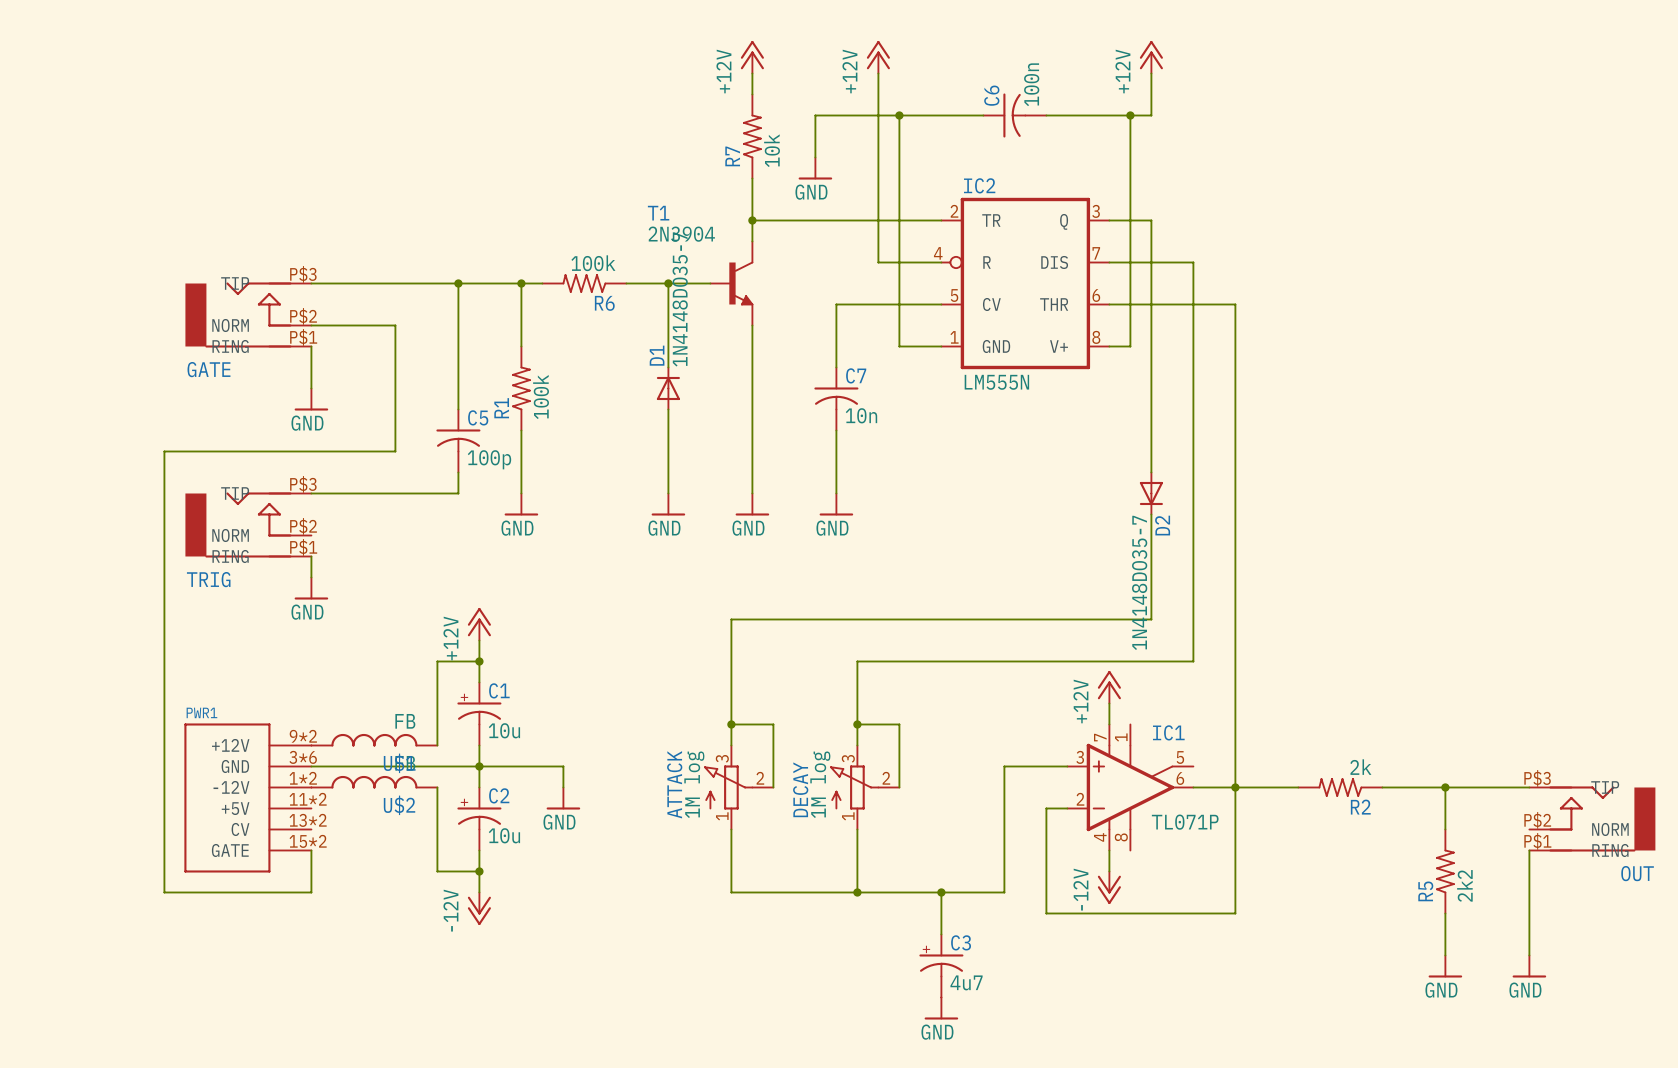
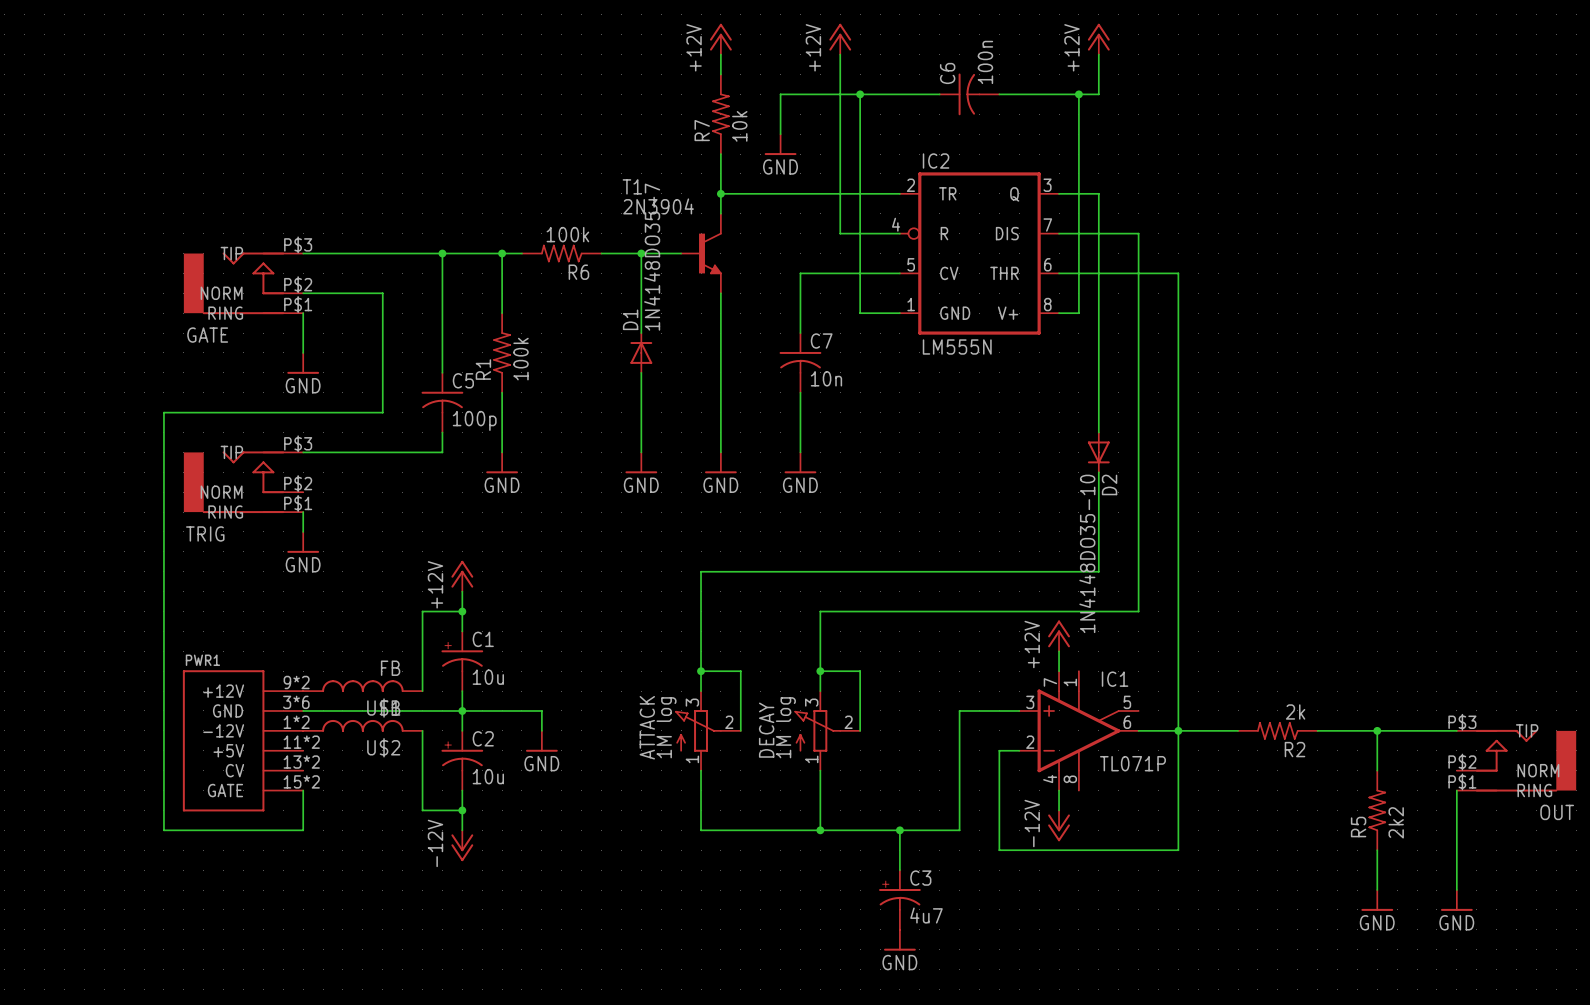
D2 value: 1N4148DO35-7 (1139, 582) -> 1N4148DO35-10 (1087, 553)

